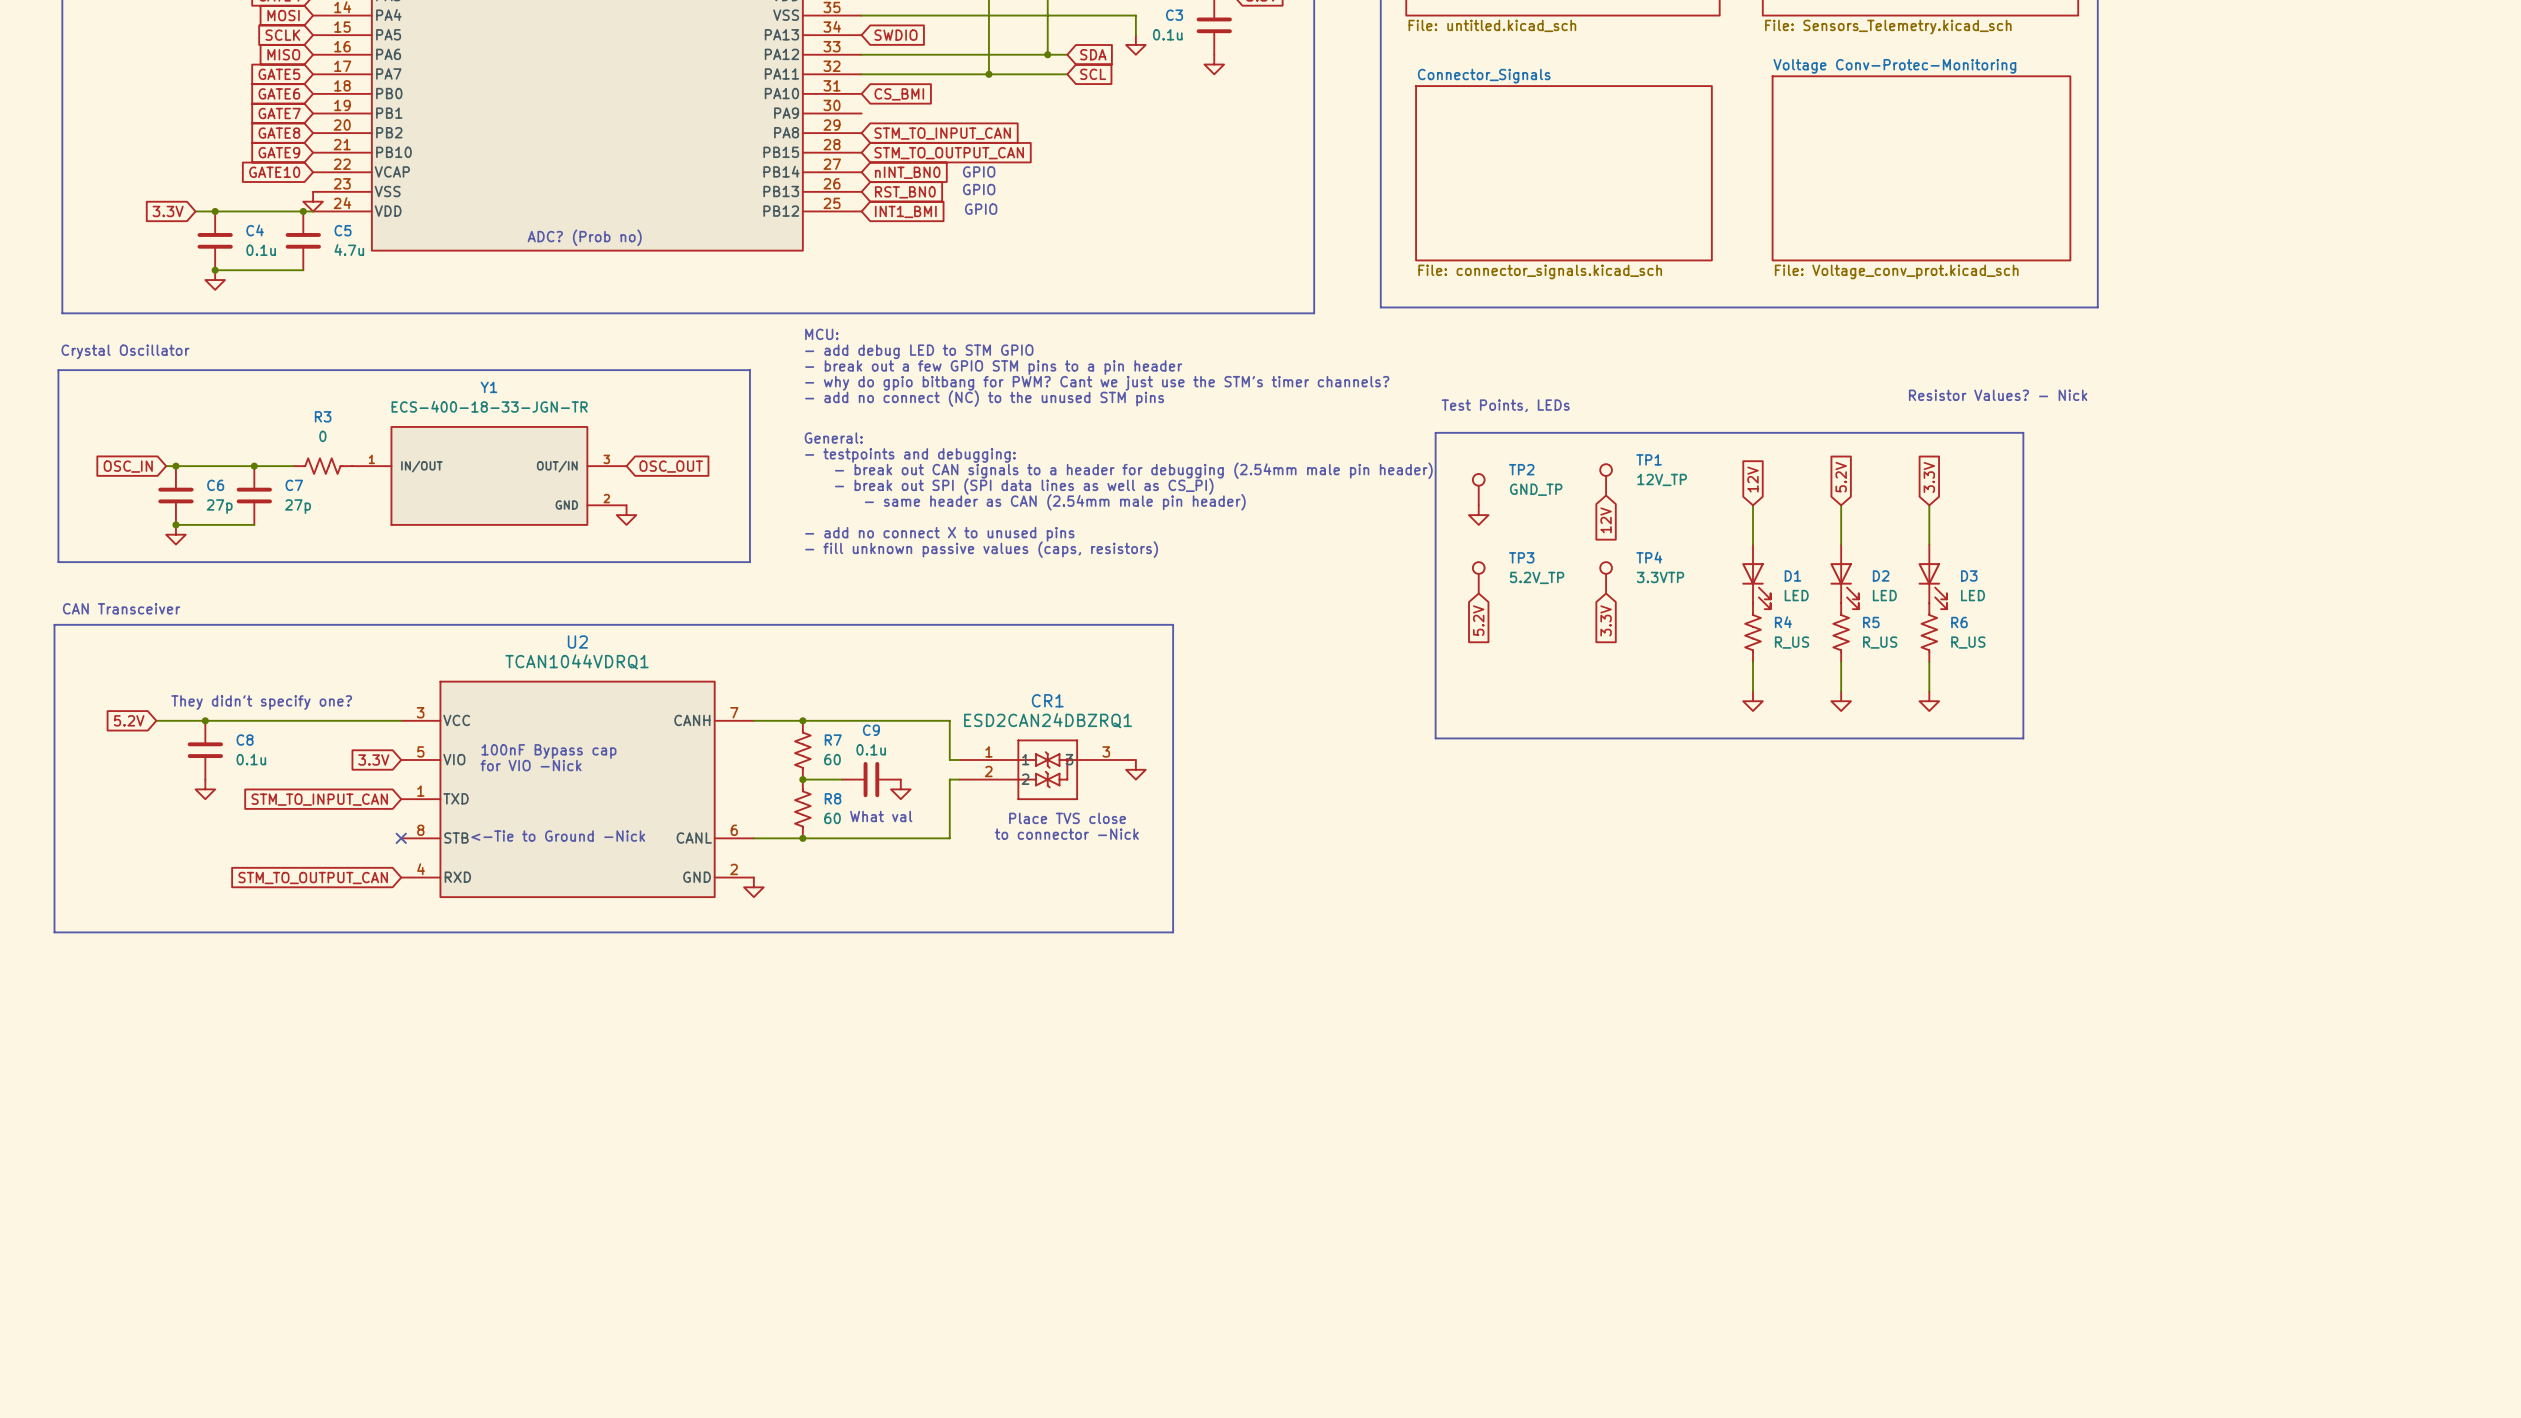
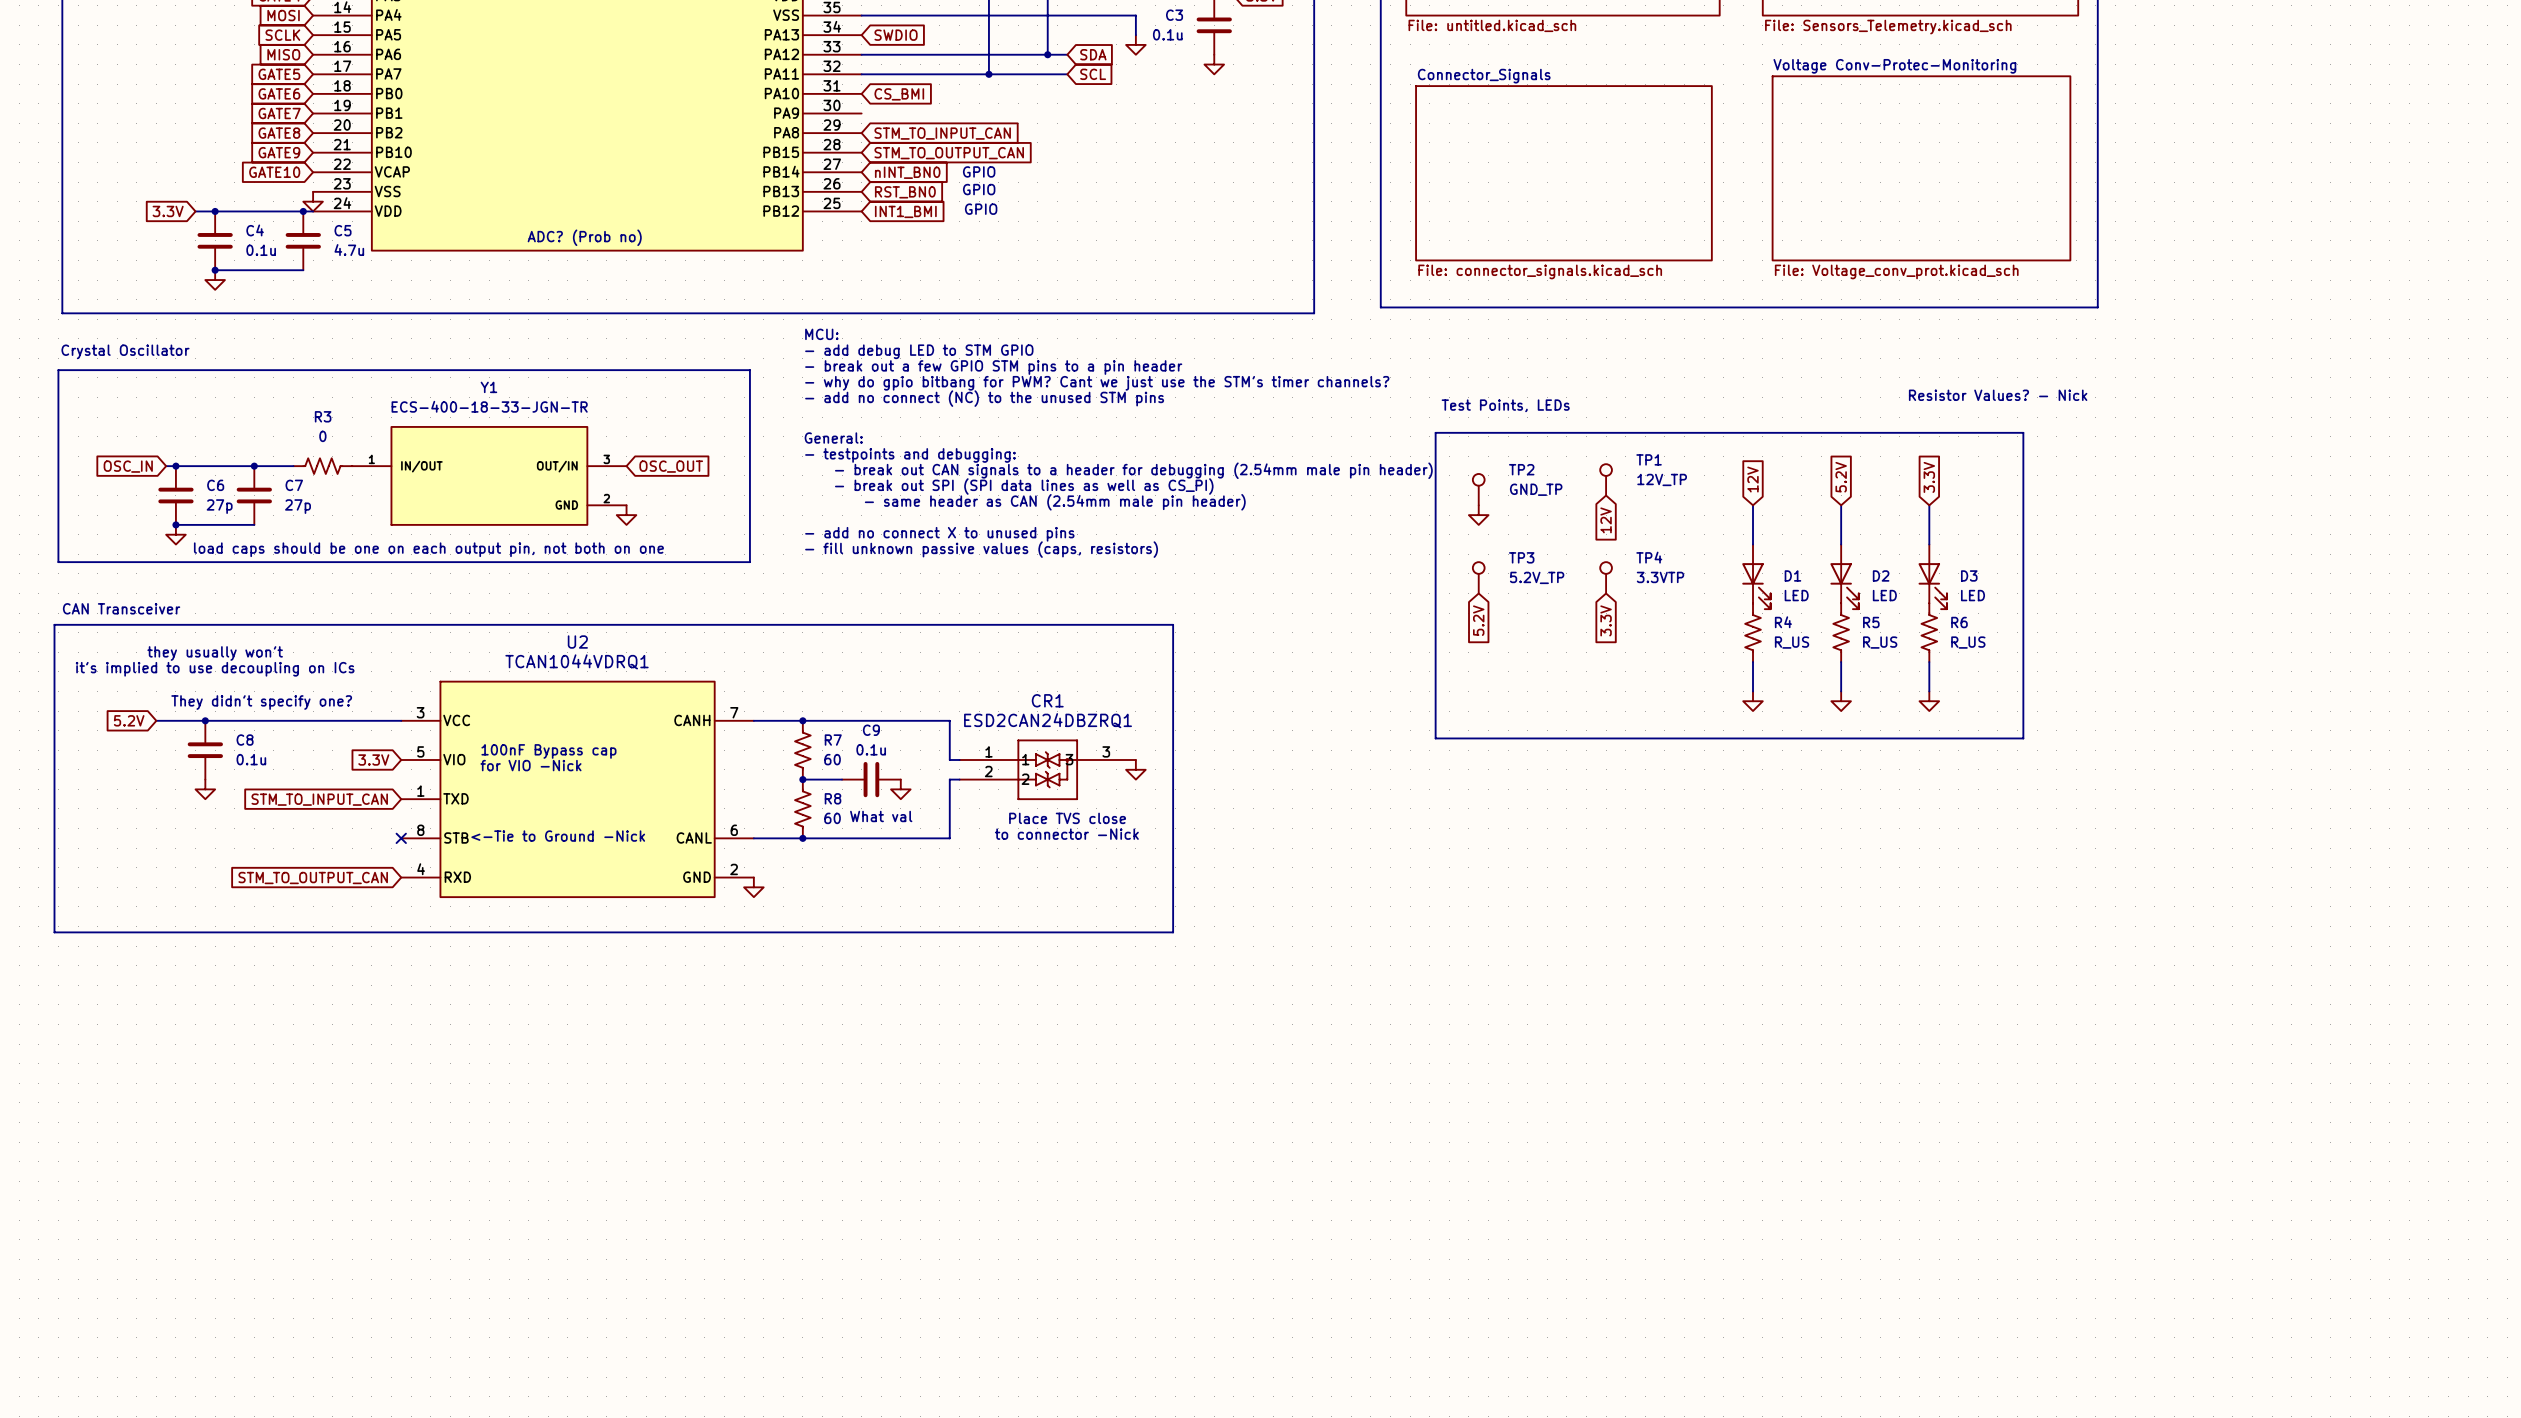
text: none -> load caps should be one on each output pin, not both on one (428, 549)
text: none -> they usually won't (215, 653)
text: none -> it's implied to use decoupling on ICs (215, 669)

